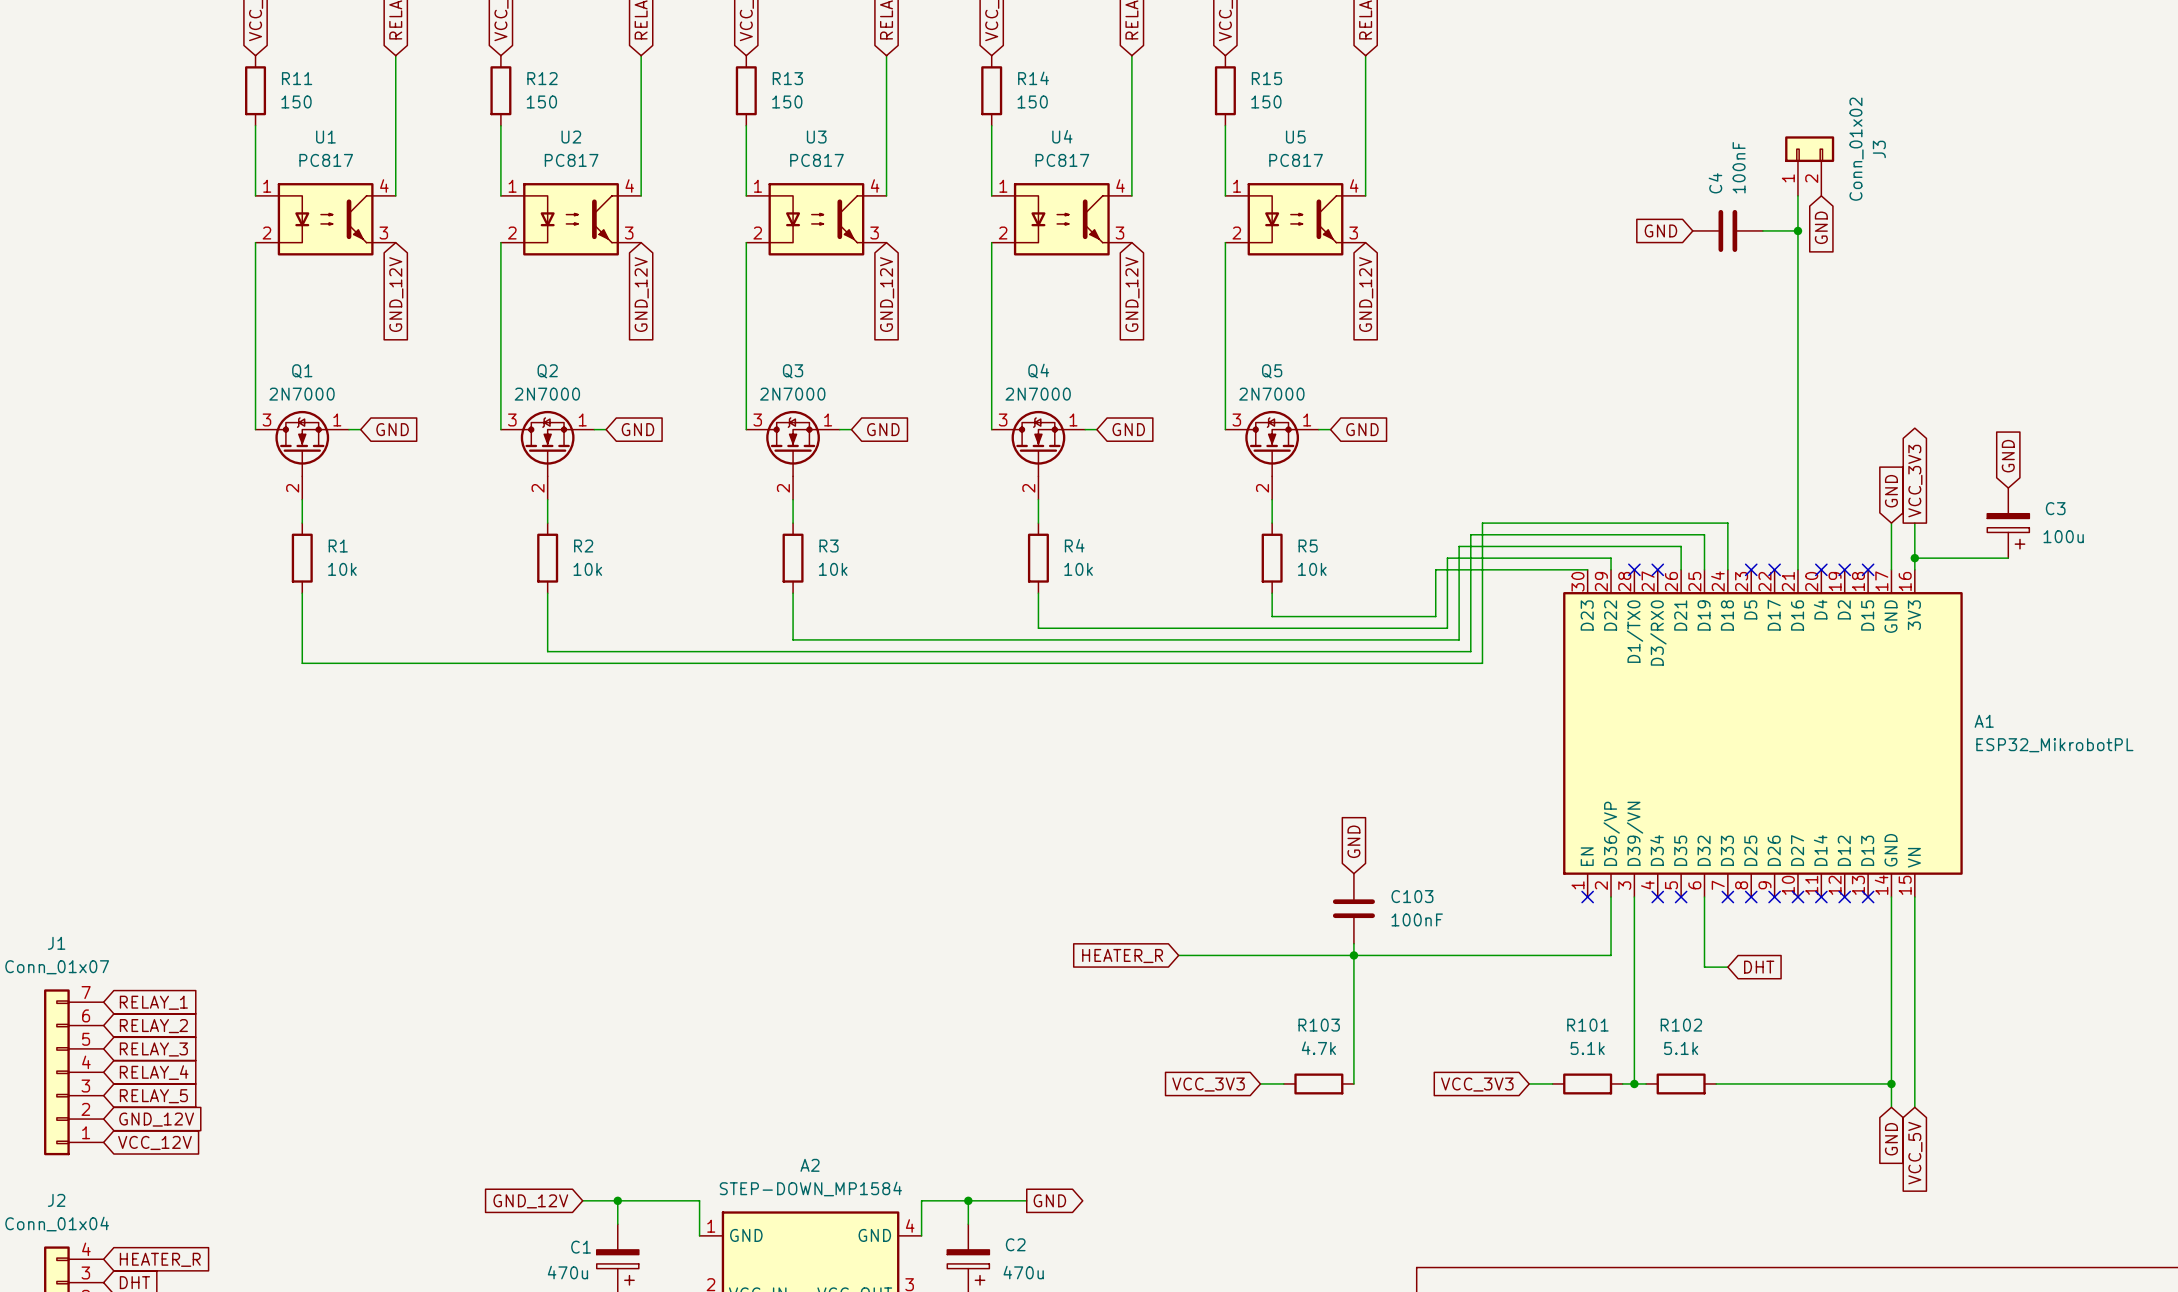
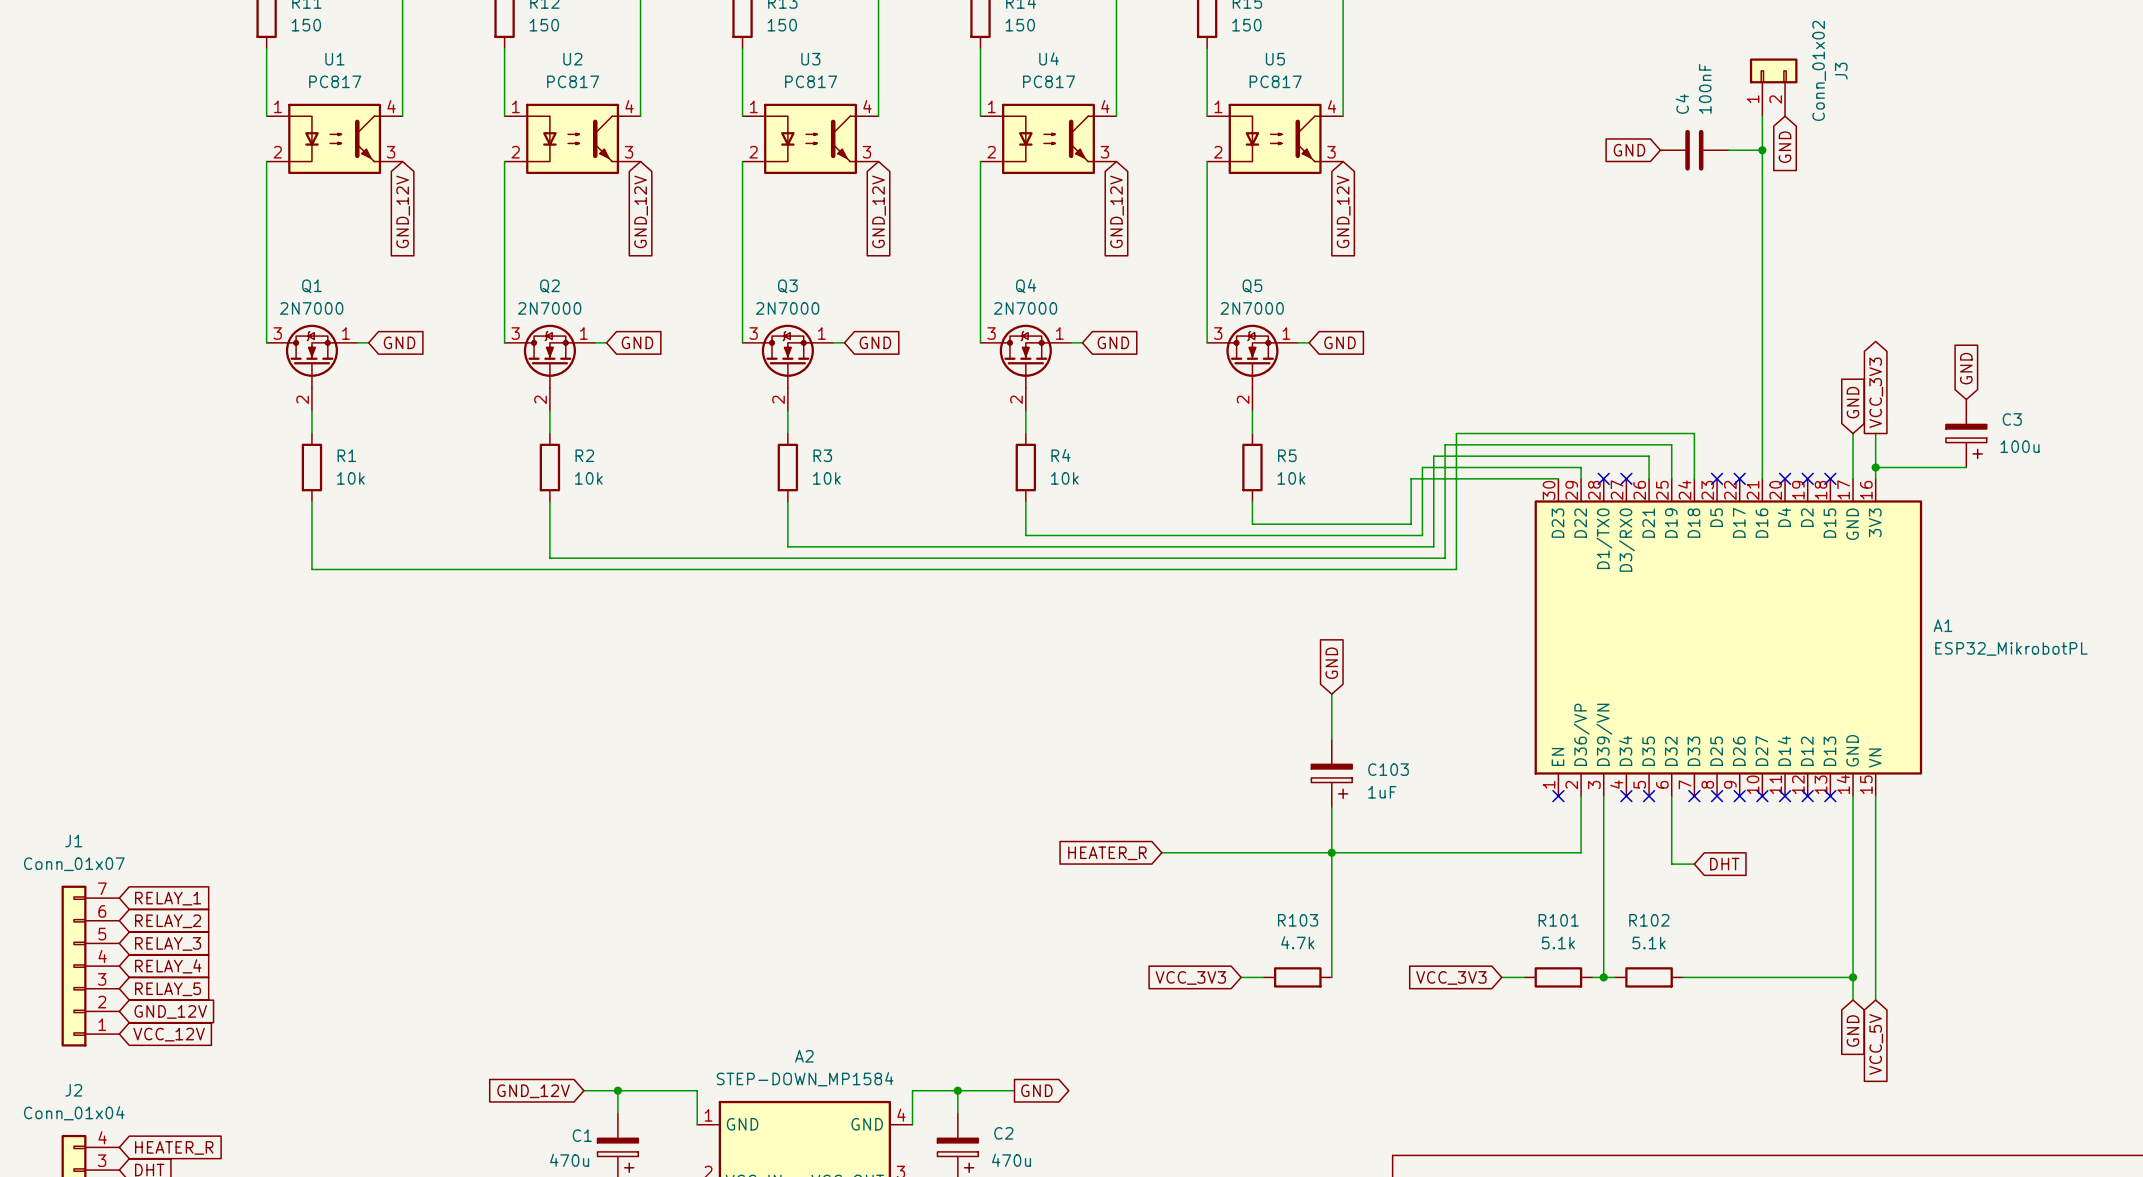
wire: none -> (1331, 694) (1331, 739)
global label position: GND (1353, 841) -> GND (1331, 663)
C103 symbol: [1332, 873, 1375, 944] -> [1311, 739, 1353, 808]
C103 value: 100nF (1417, 919) -> 1uF (1382, 792)

